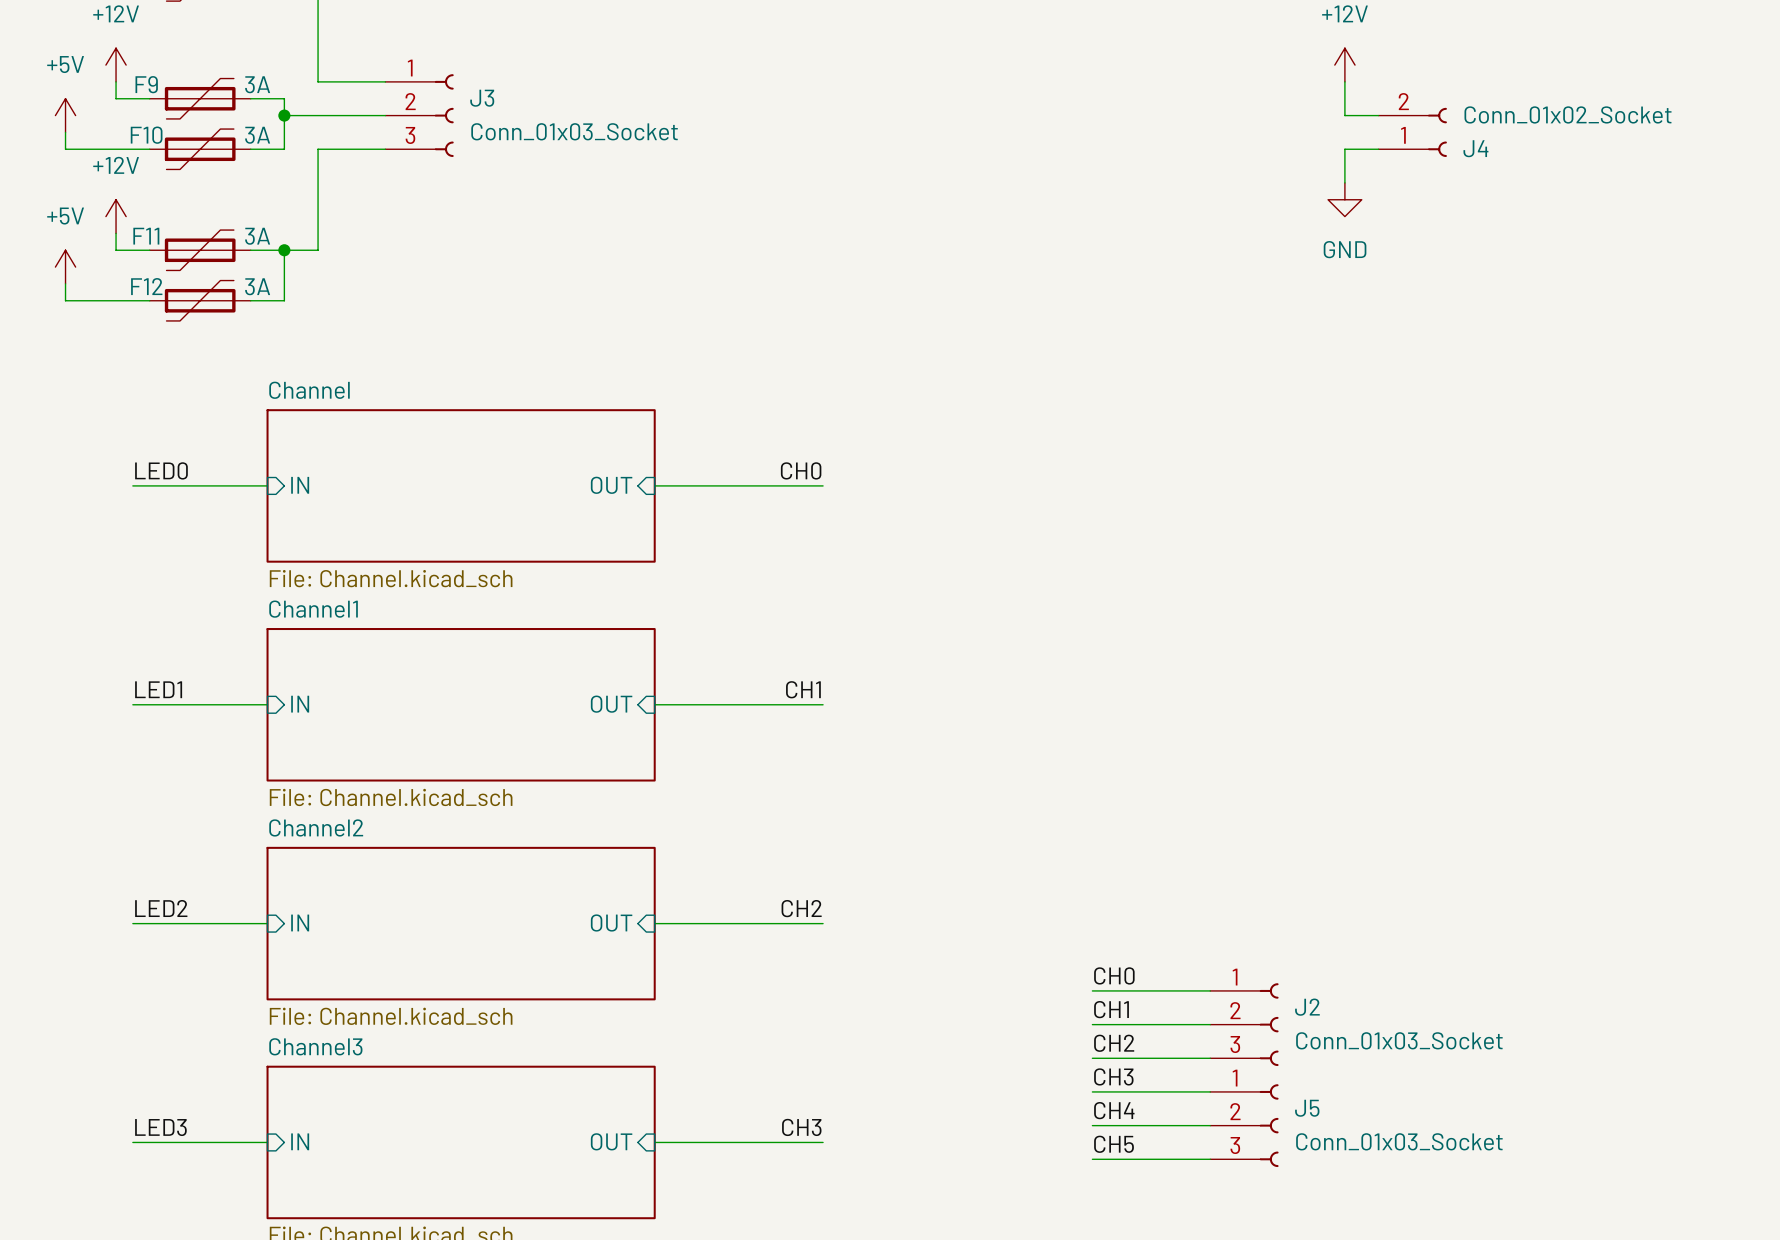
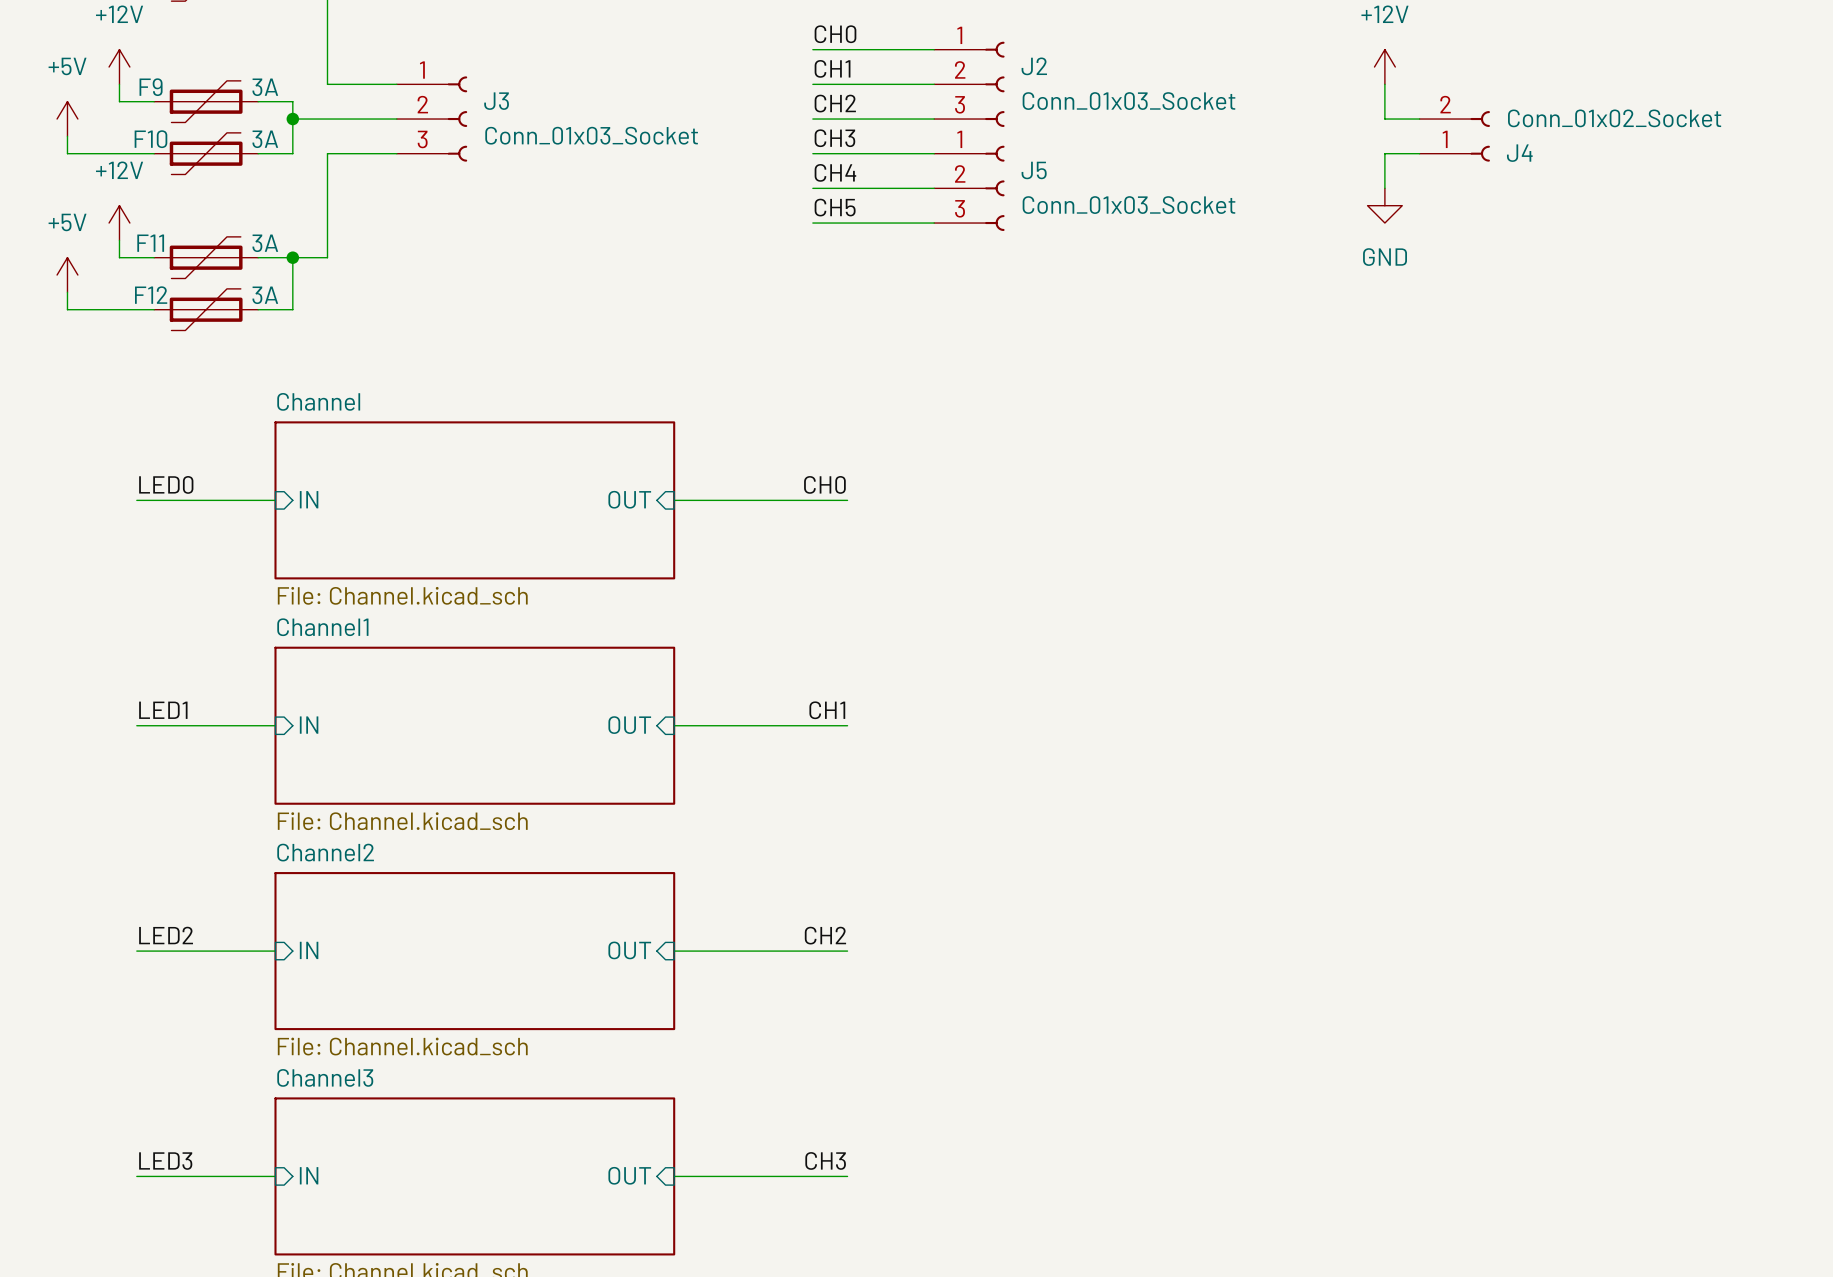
label: none -> CH0 (835, 34)
wire: none -> (812, 49) (934, 49)
label: none -> CH1 (832, 68)
wire: none -> (812, 84) (934, 84)
label: none -> CH2 (835, 103)
wire: none -> (812, 119) (934, 119)
label: none -> CH3 (834, 138)
wire: none -> (812, 153) (934, 153)
label: none -> CH4 (835, 172)
wire: none -> (812, 188) (934, 188)
label: none -> CH5 (835, 207)
wire: none -> (812, 223) (934, 223)
label: CH0 (1114, 975) -> none
wire: (1092, 990) (1210, 990) -> none
label: CH1 (1111, 1009) -> none
wire: (1092, 1024) (1210, 1024) -> none
J2 position: (1244, 1024) -> (969, 84)
label: CH2 (1114, 1043) -> none
wire: (1092, 1058) (1210, 1058) -> none
label: CH3 (1113, 1076) -> none
wire: (1092, 1091) (1210, 1091) -> none
label: CH4 (1114, 1110) -> none
wire: (1092, 1125) (1210, 1125) -> none
J5 position: (1244, 1125) -> (969, 188)
label: CH5 (1114, 1144) -> none
wire: (1092, 1159) (1210, 1159) -> none

